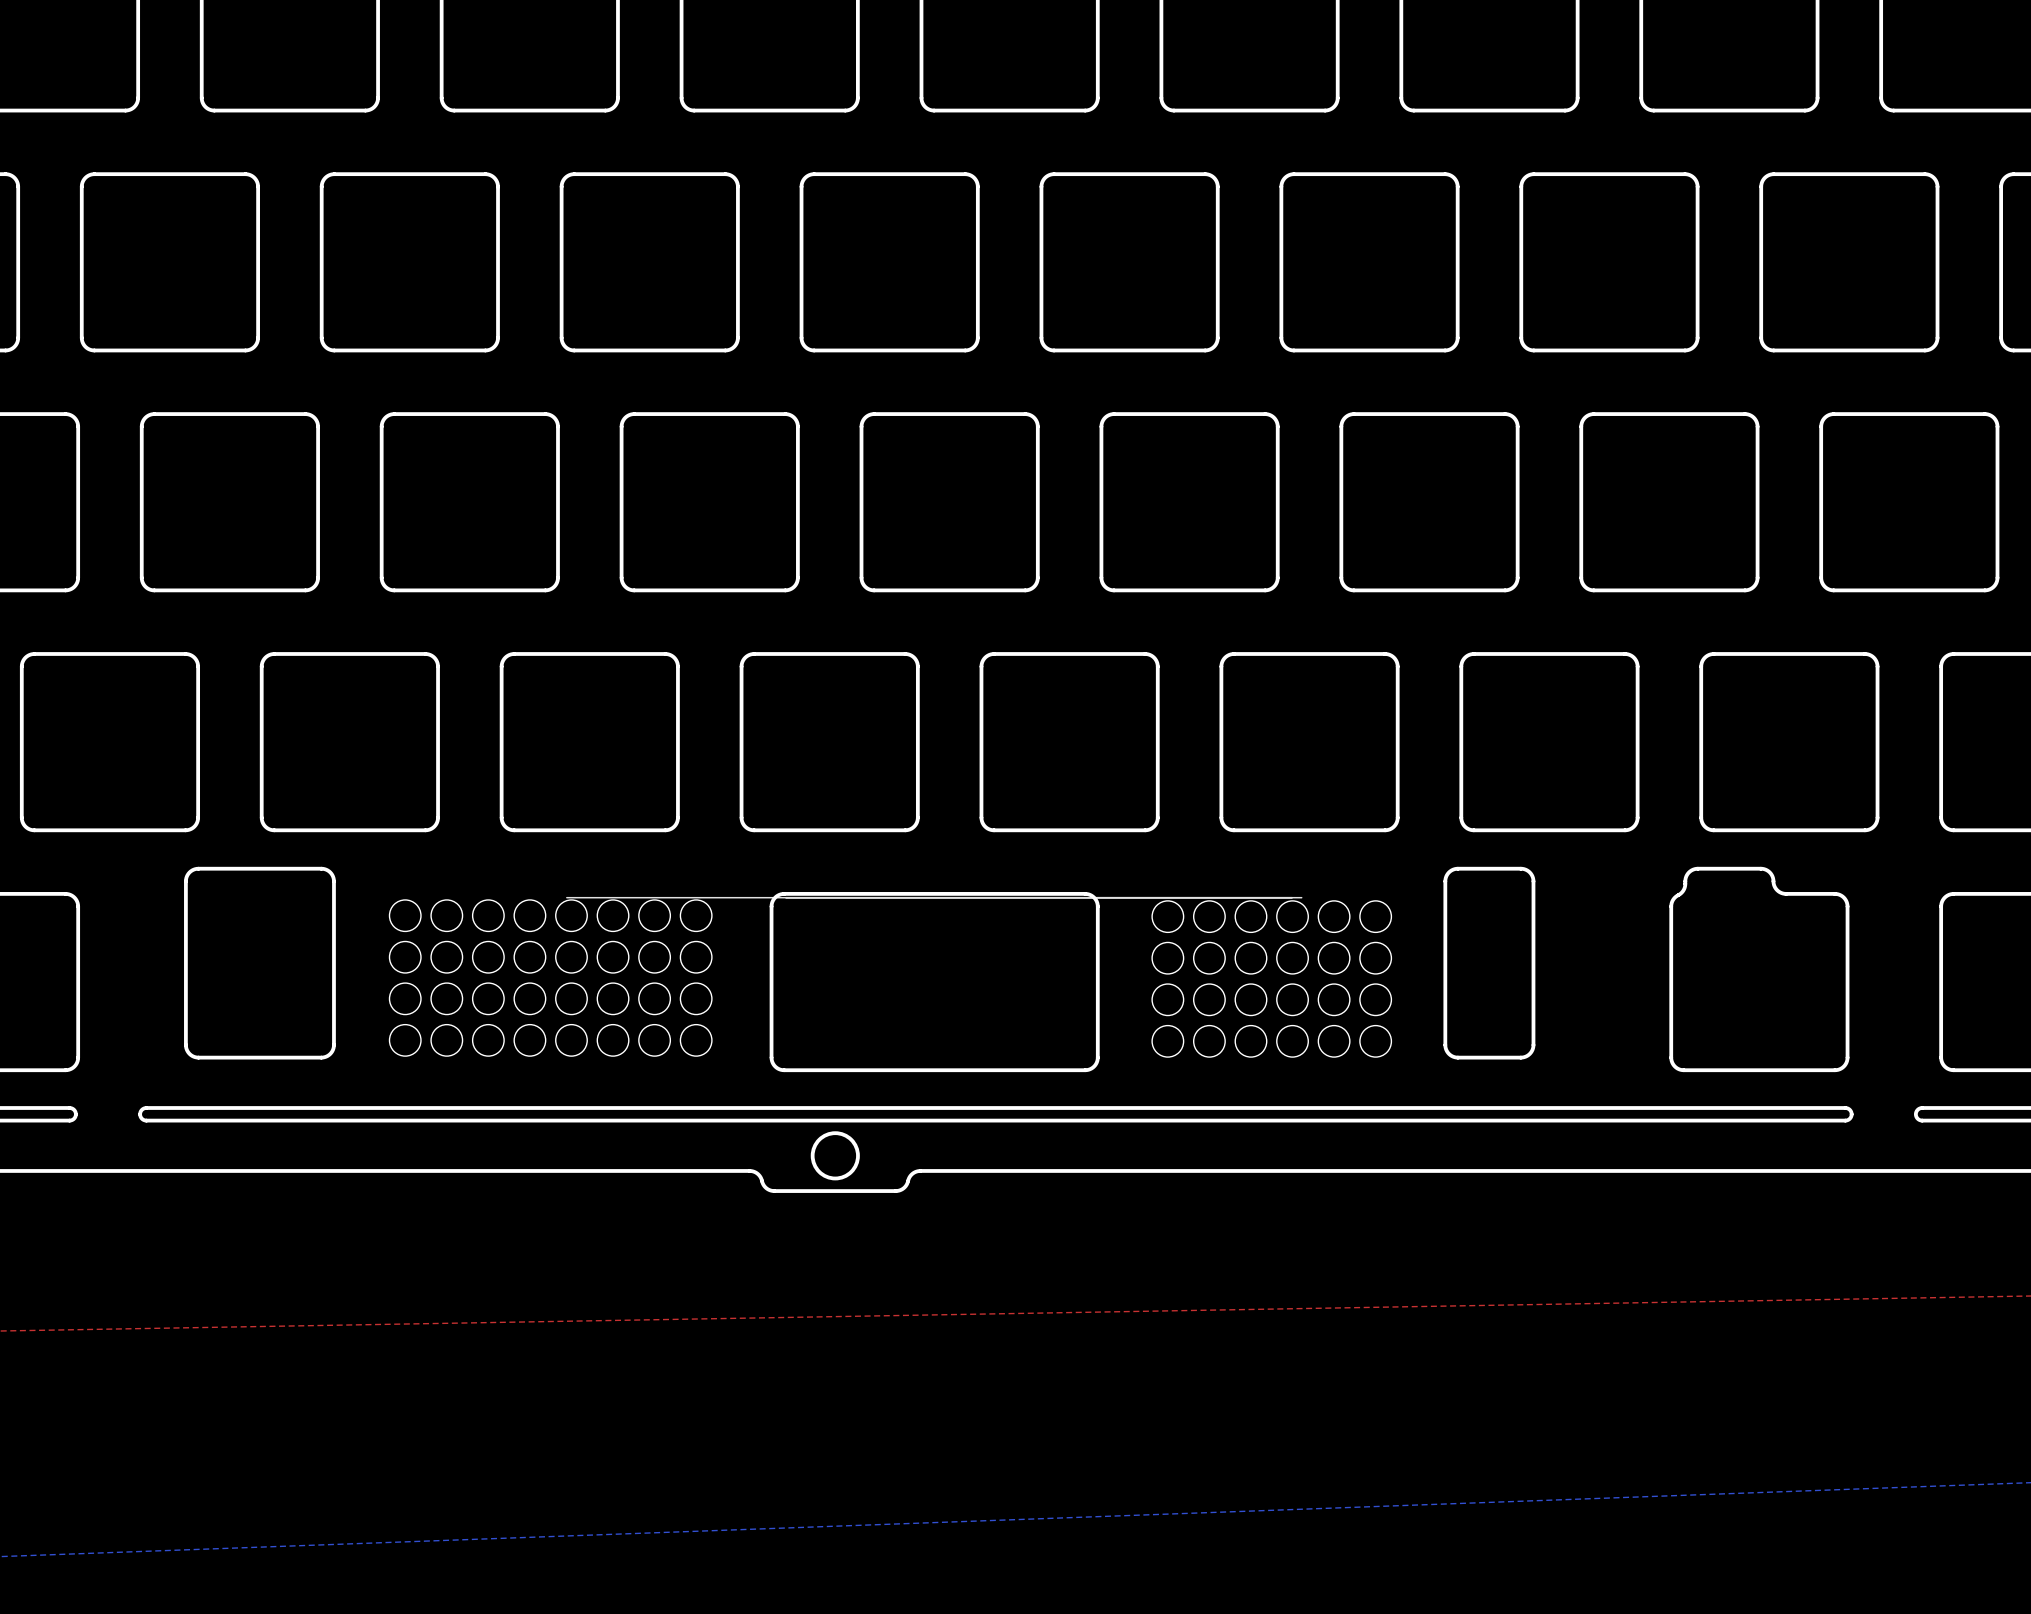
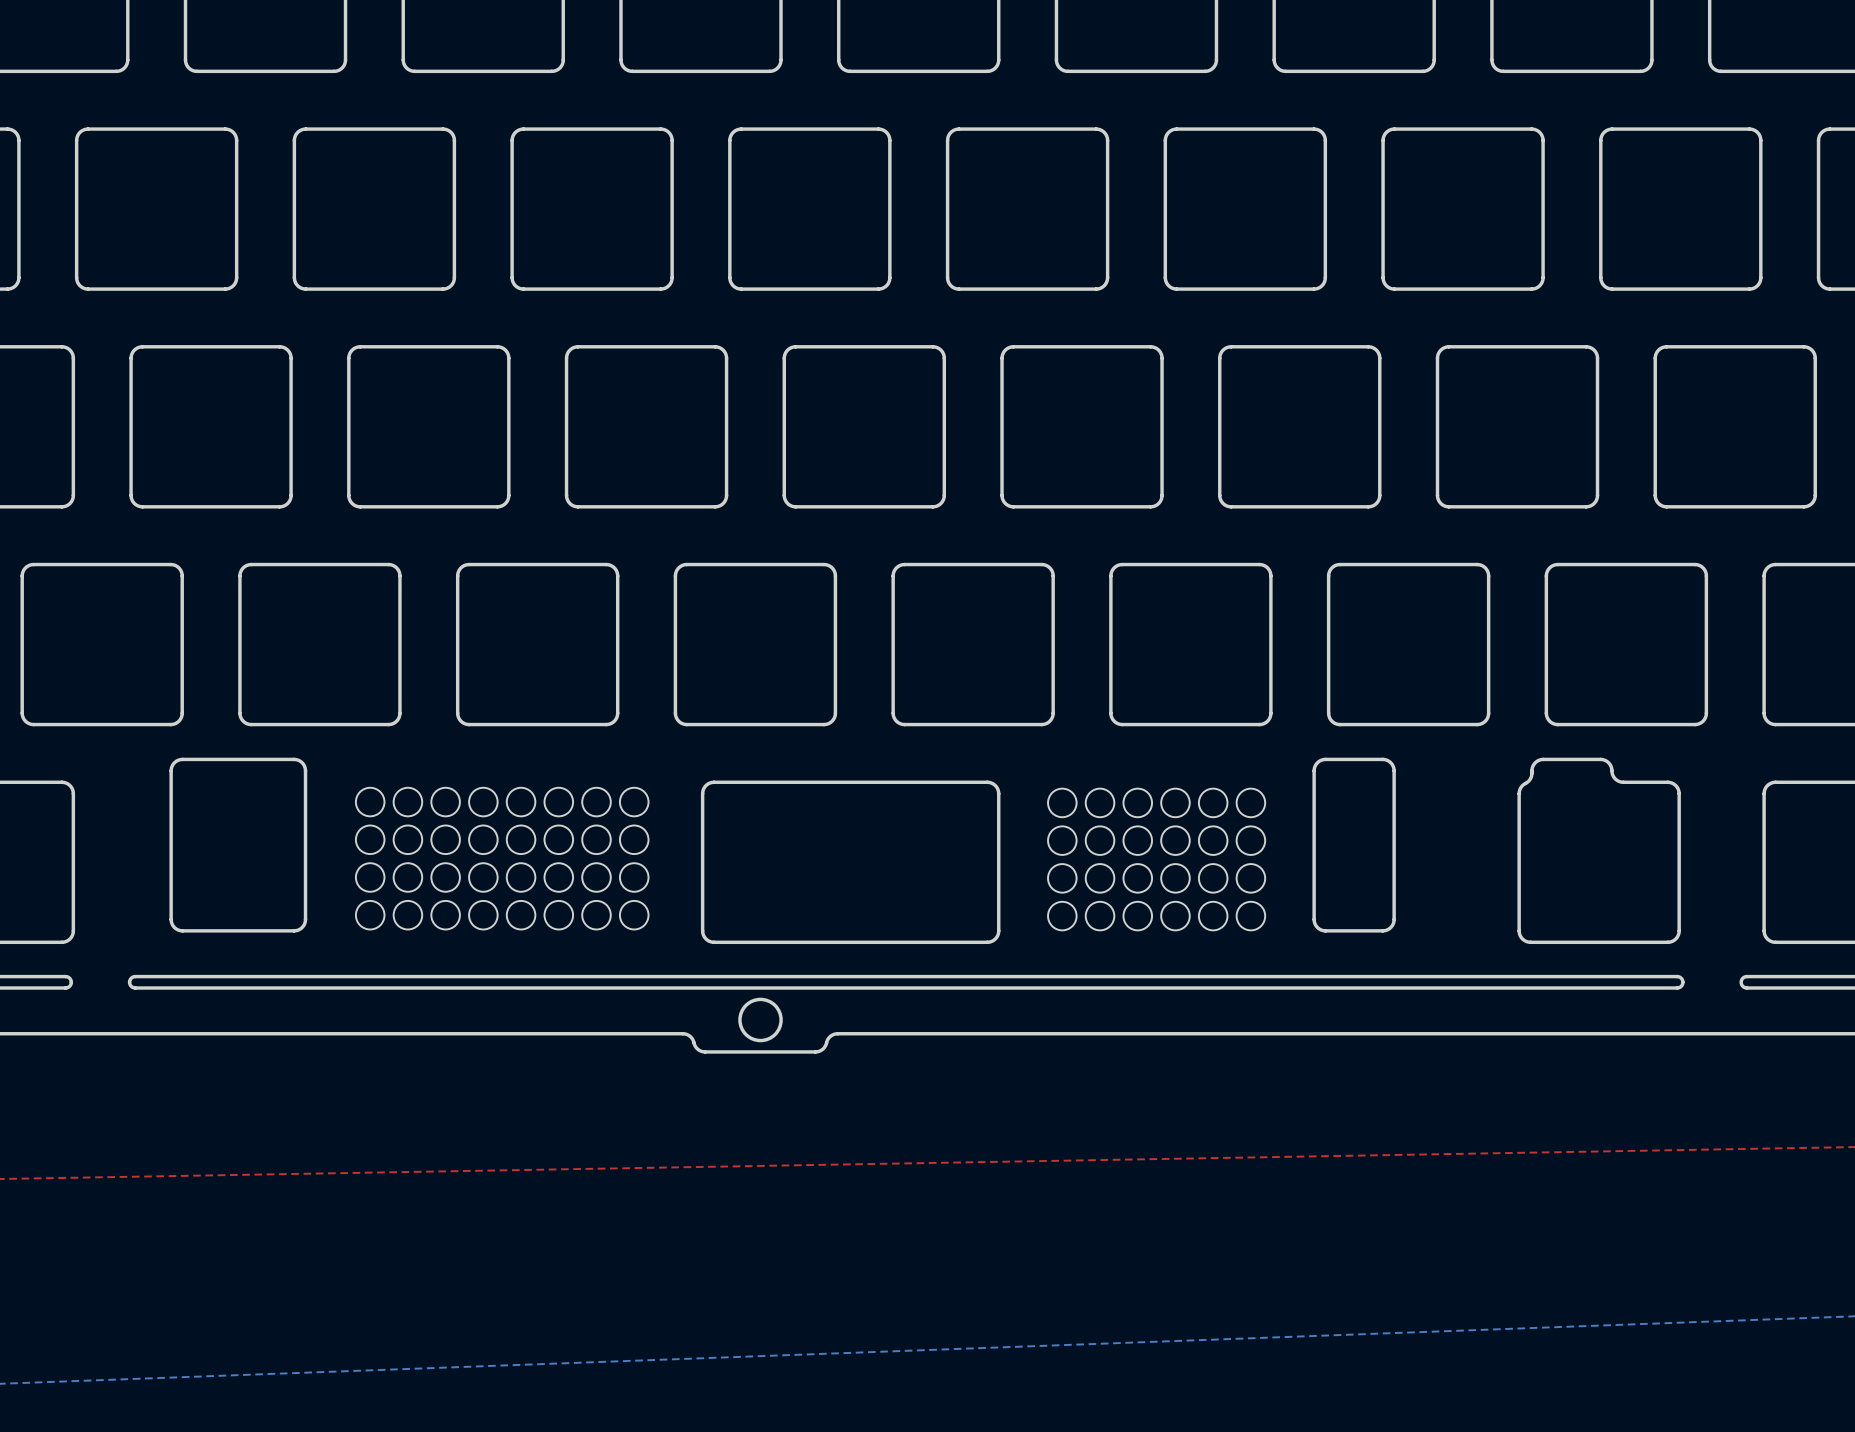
line: (566, 897) (1301, 897) -> none

